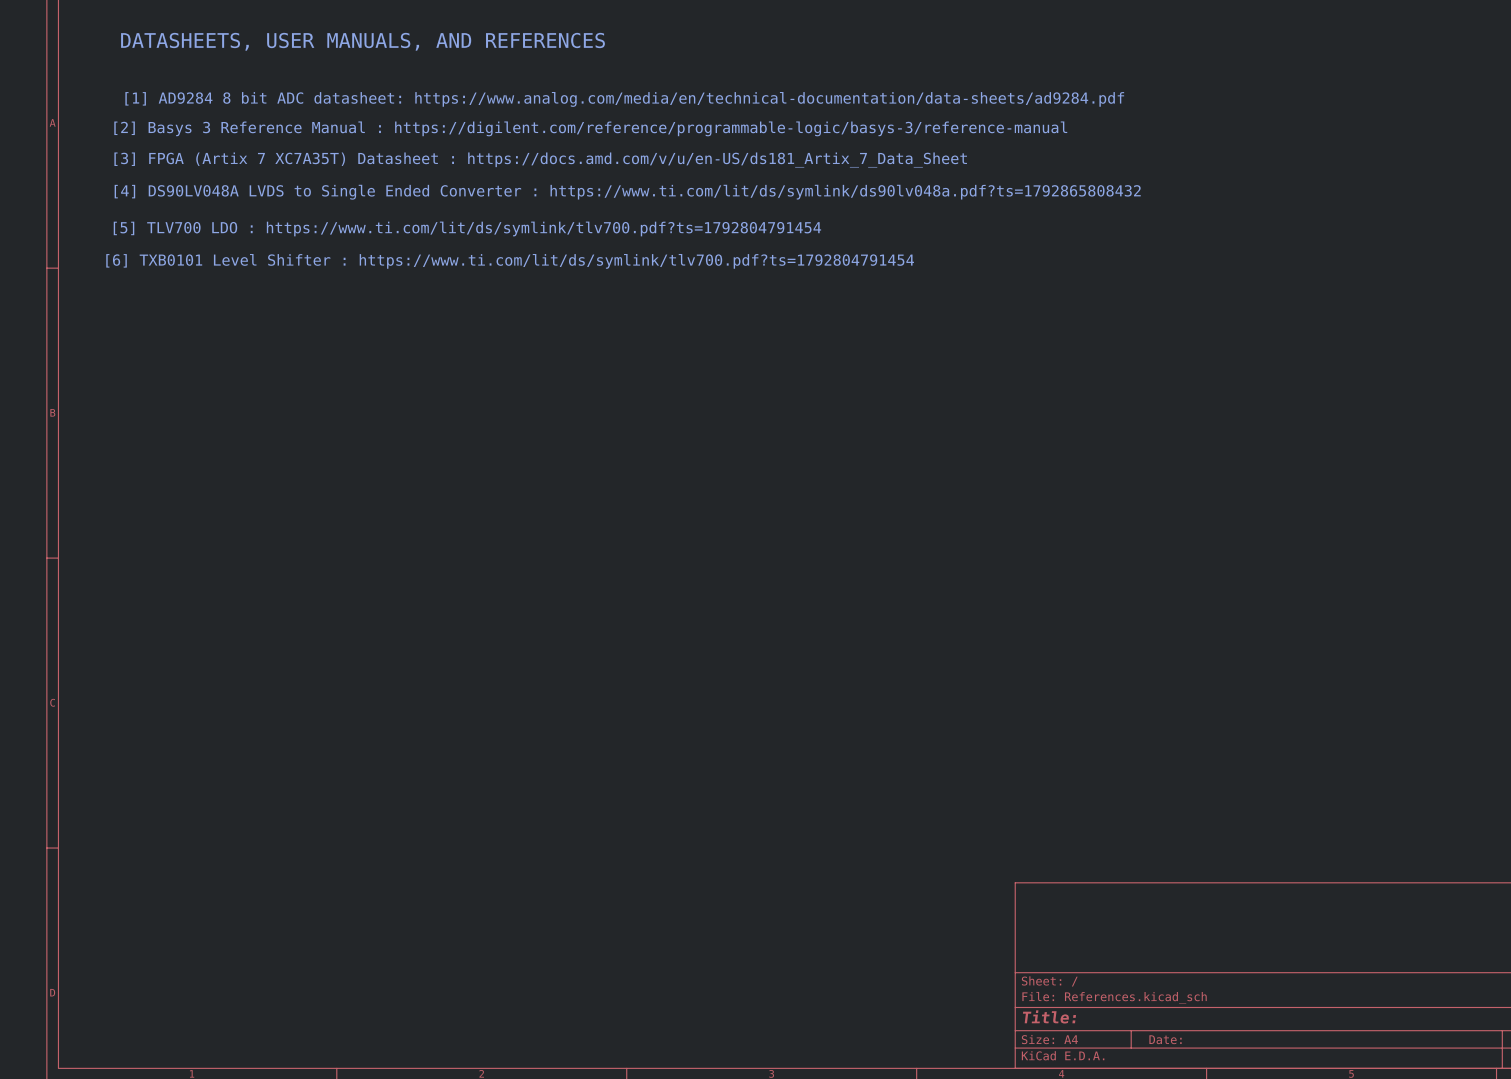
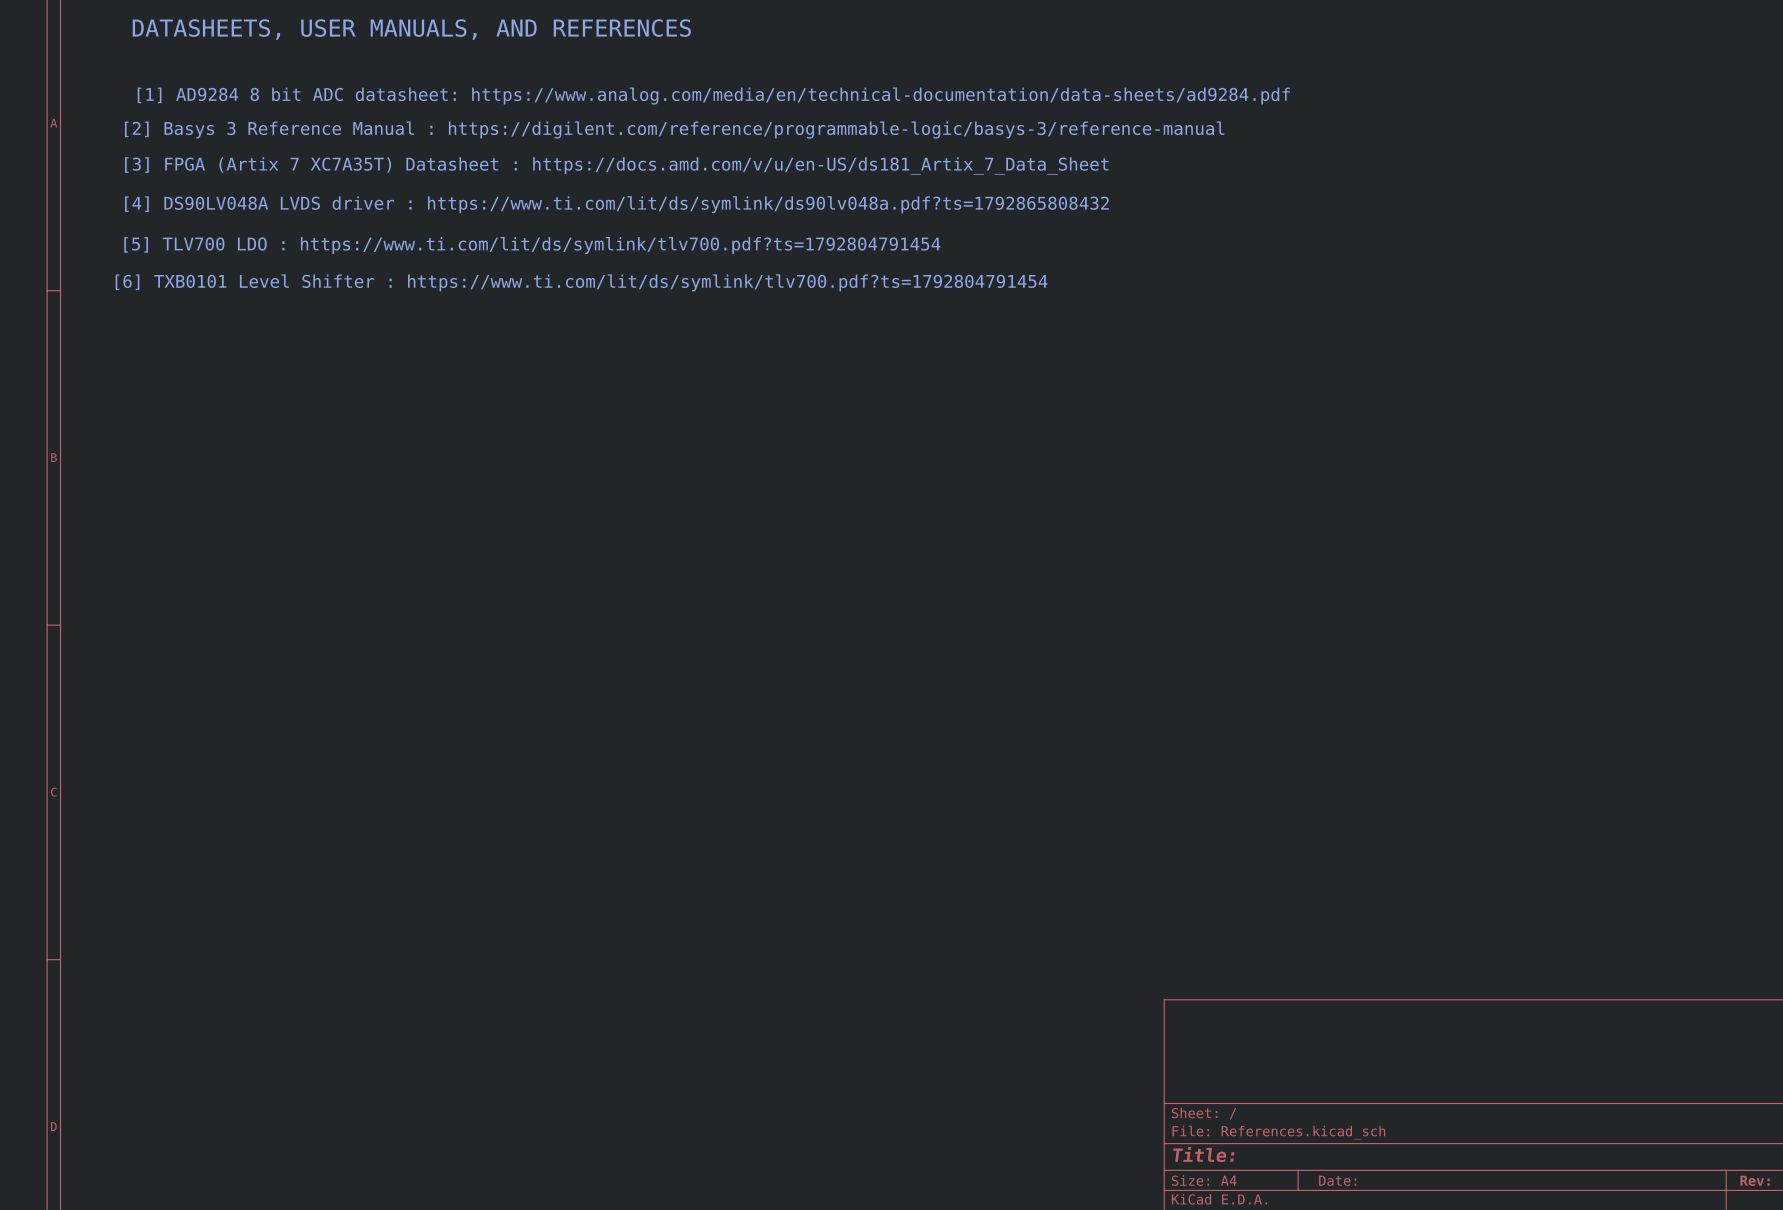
text: [4] DS90LV048A LVDS to Single Ended Converter : https://www.ti.com/lit/ds/symlink/ds90lv048a.pdf?ts=1792865808432 (627, 192) -> [4] DS90LV048A LVDS driver : https://www.ti.com/lit/ds/symlink/ds90lv048a.pdf?ts=1792865808432 (616, 204)

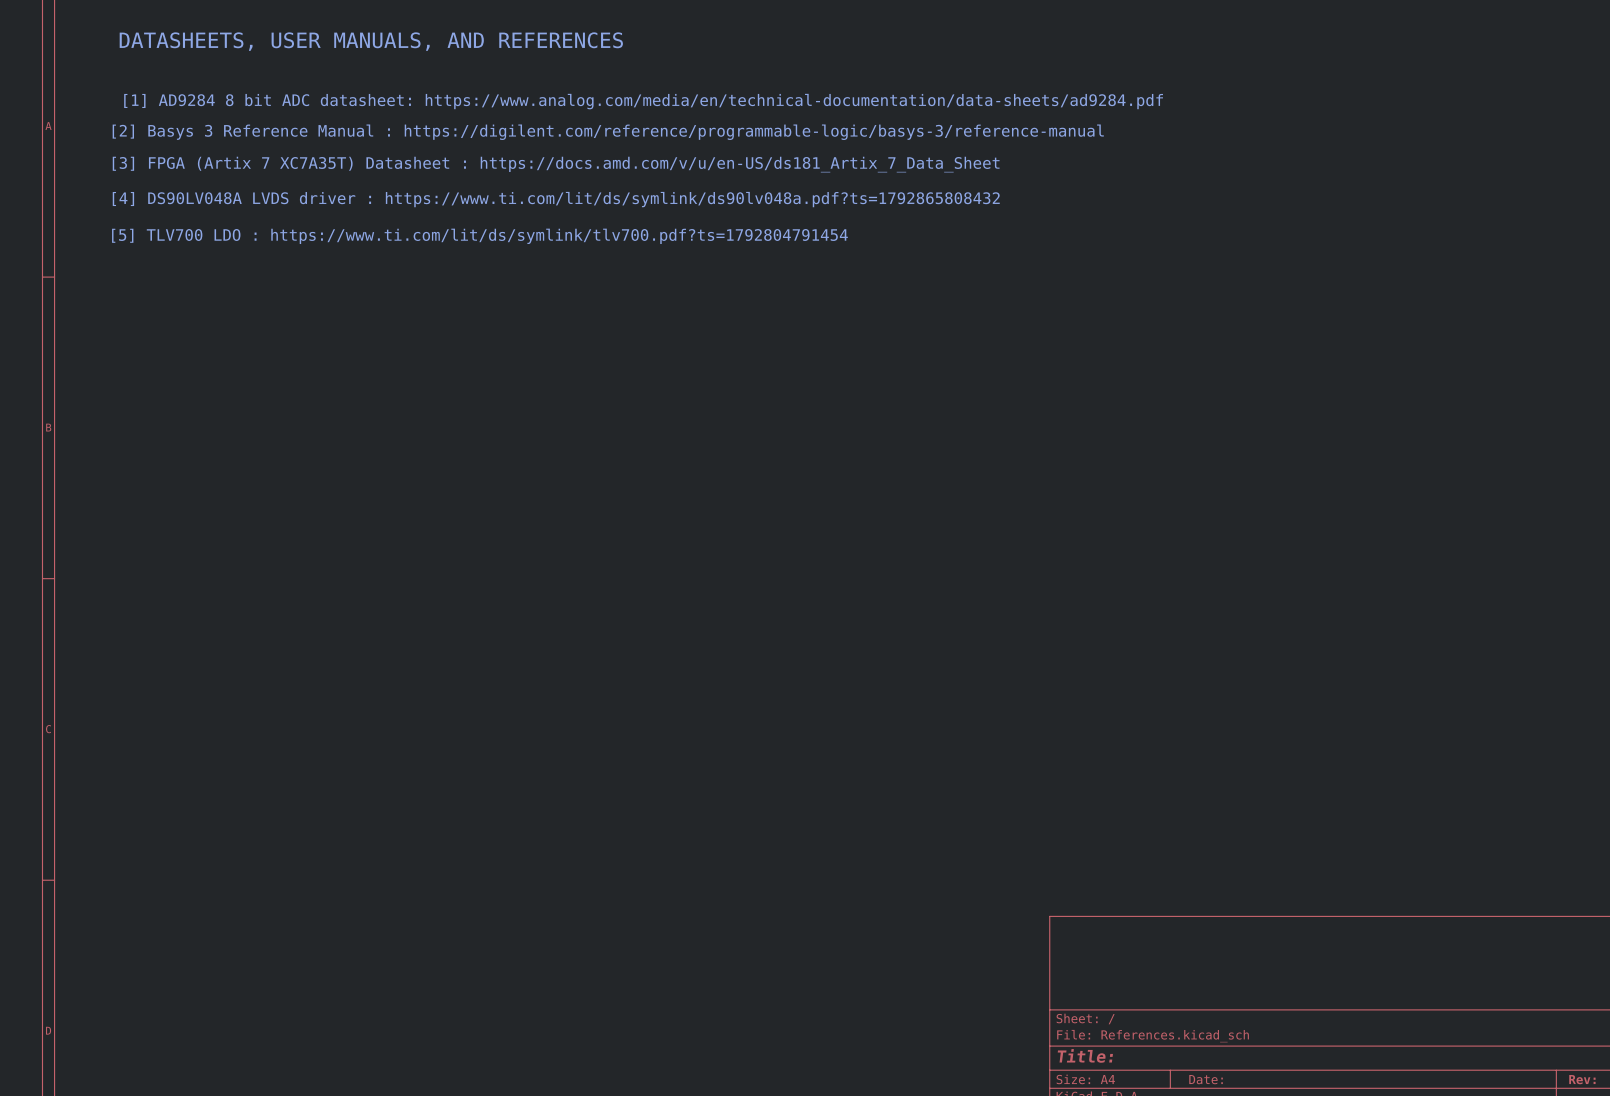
text: [6] TXB0101 Level Shifter : https://www.ti.com/lit/ds/symlink/tlv700.pdf?ts=1792804791454 (581, 282) -> none

